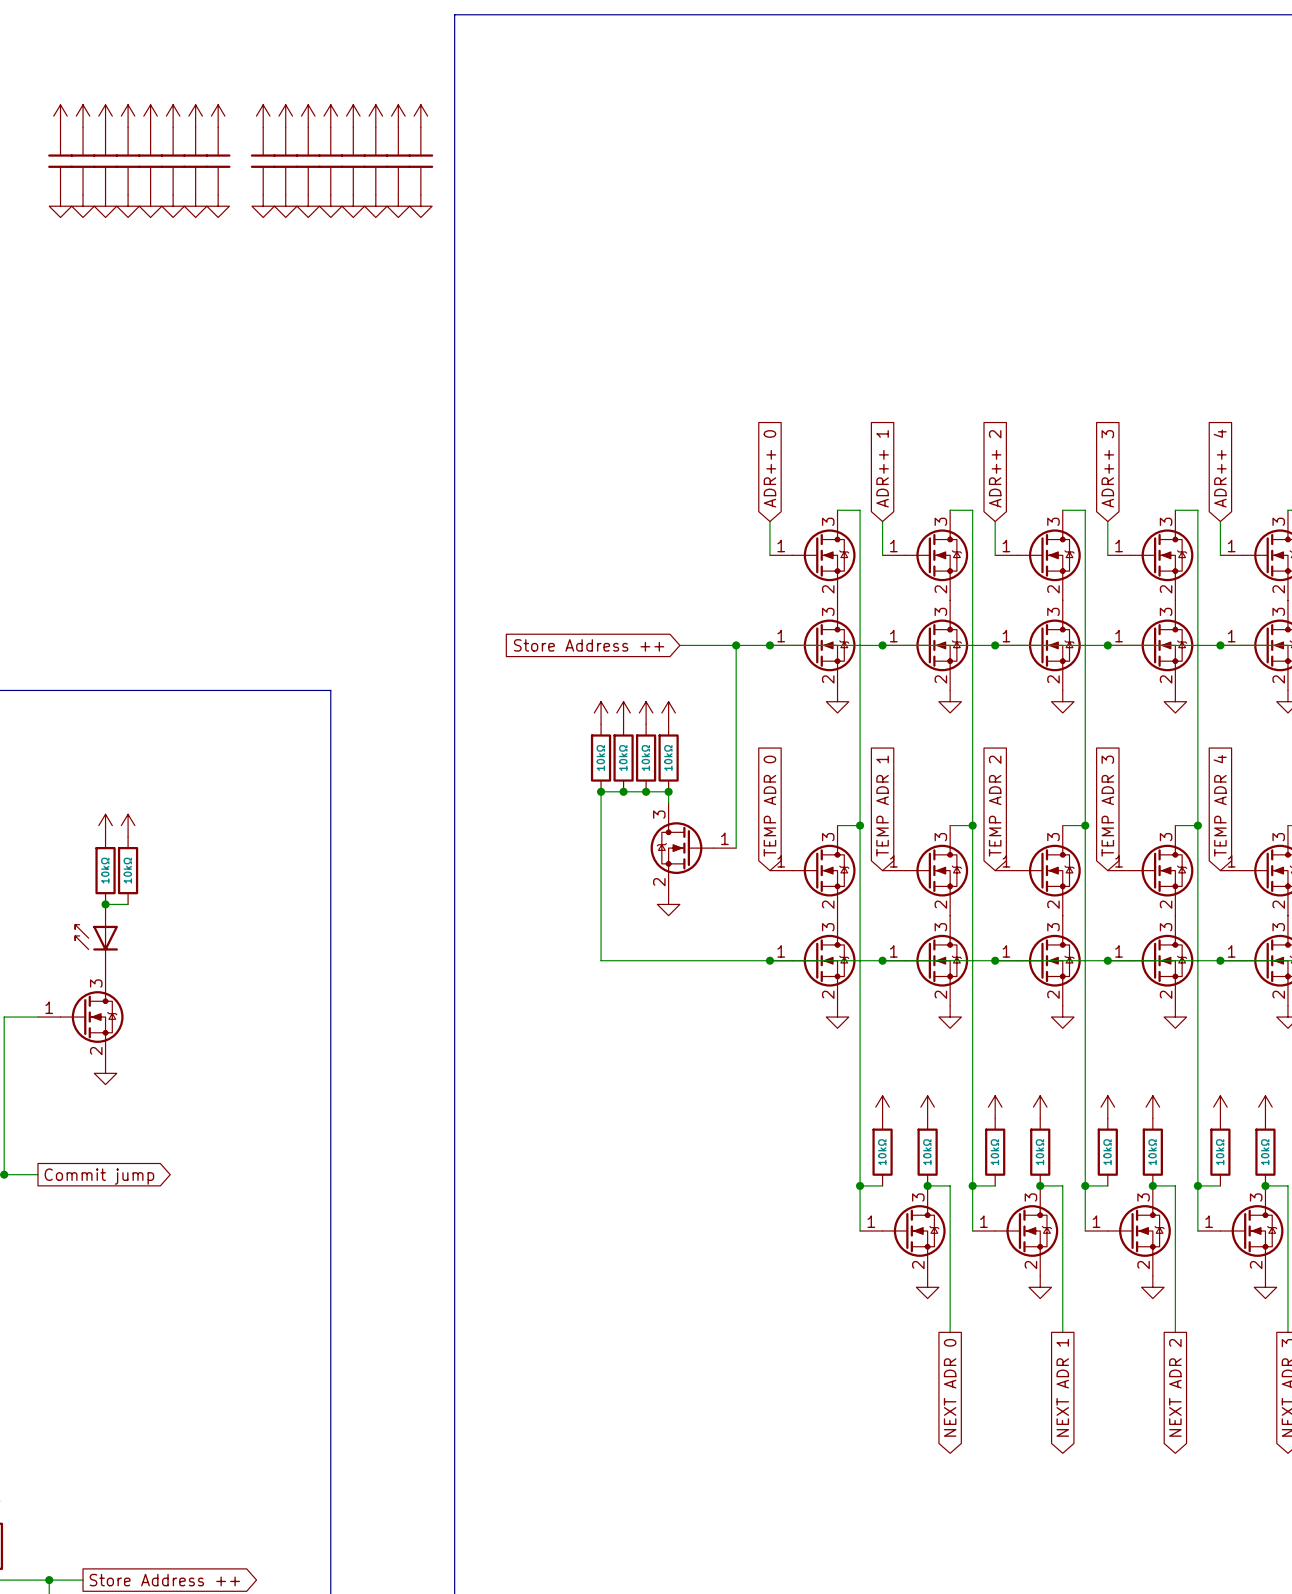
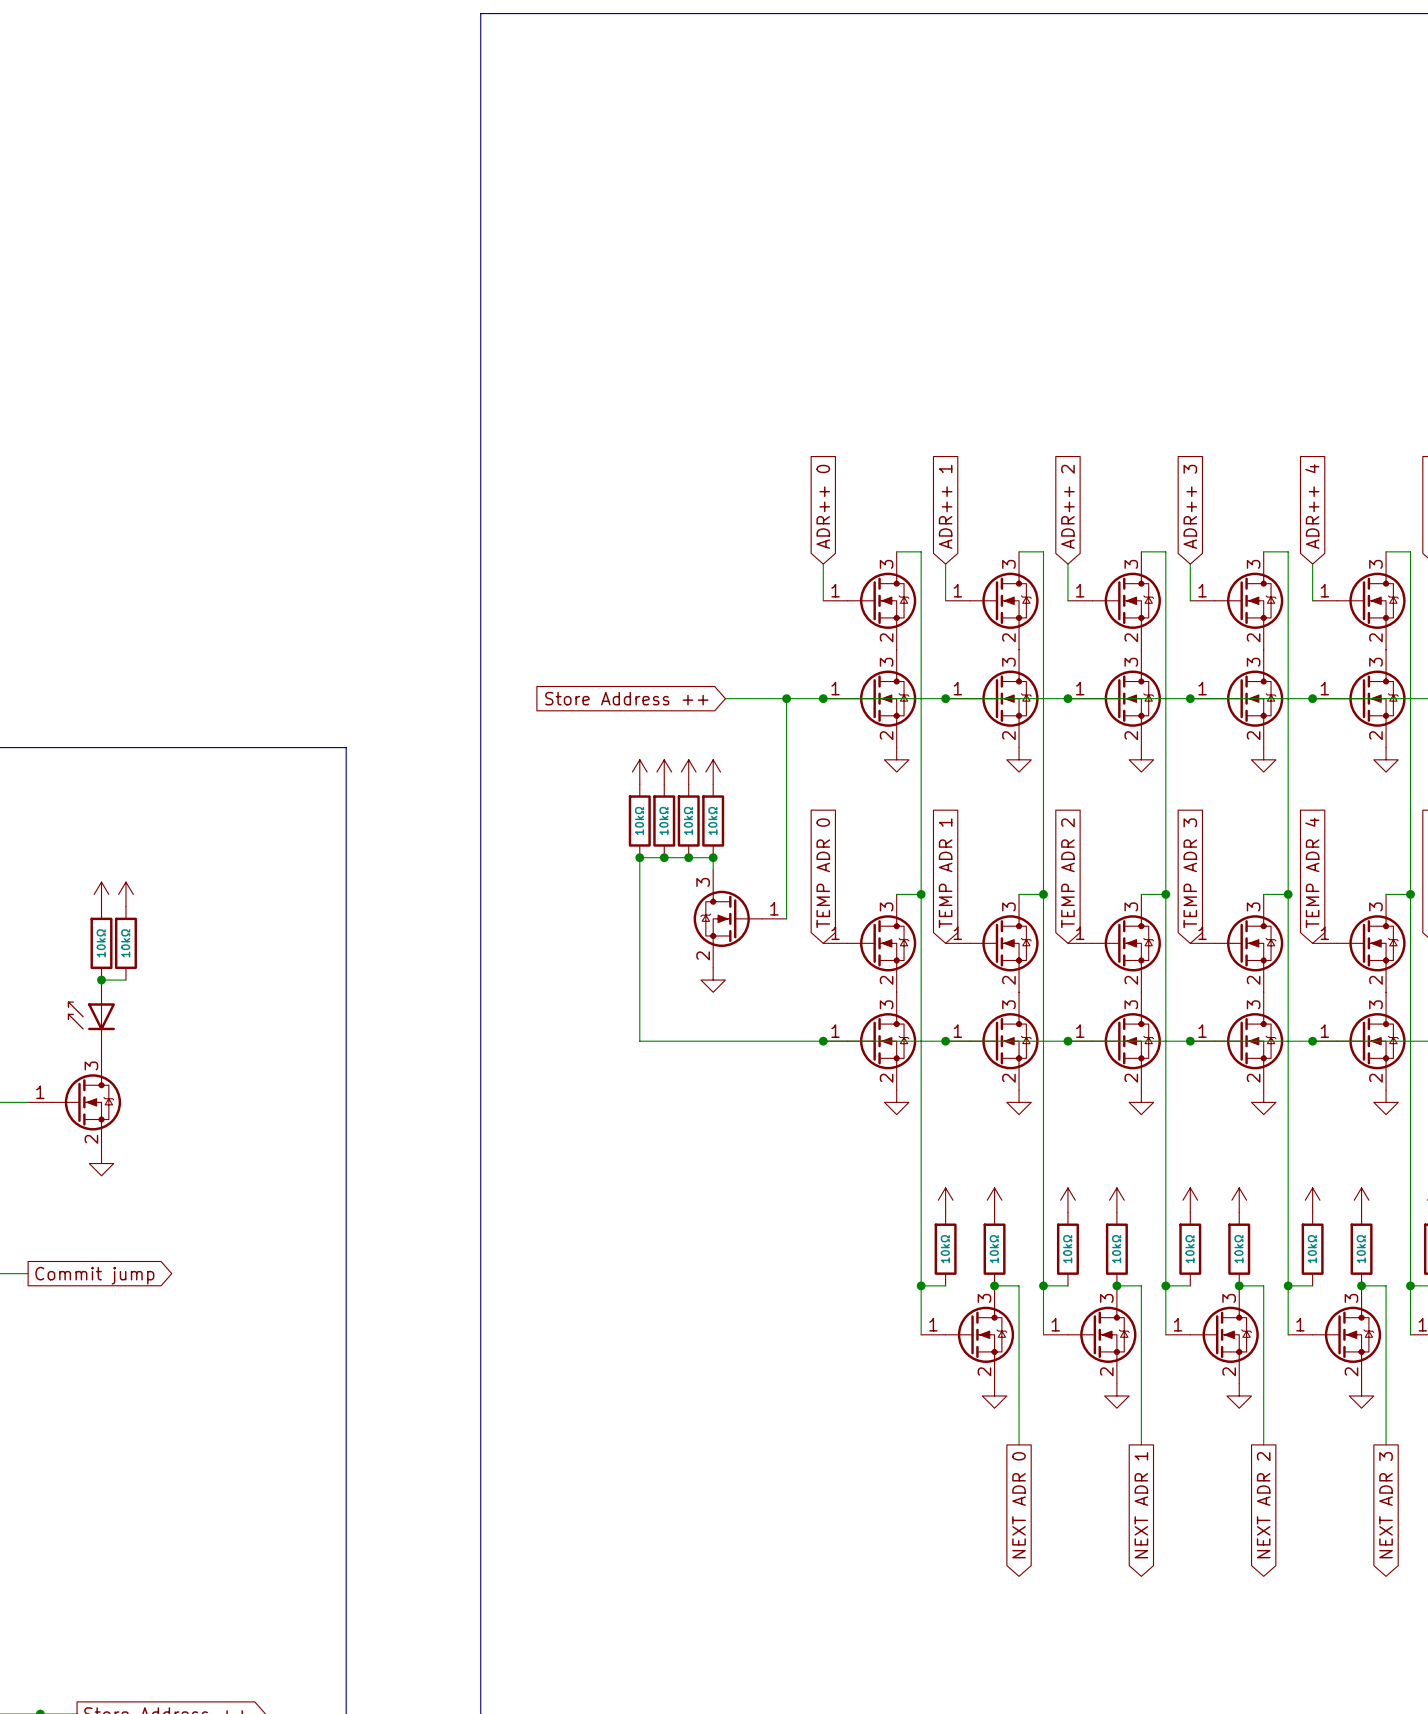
power symbol: (60, 116) -> none
power symbol: (83, 116) -> none
power symbol: (105, 116) -> none
power symbol: (128, 116) -> none
power symbol: (150, 116) -> none
power symbol: (173, 116) -> none
power symbol: (195, 116) -> none
power symbol: (218, 116) -> none
power symbol: (263, 116) -> none
power symbol: (285, 116) -> none
power symbol: (308, 116) -> none
power symbol: (330, 116) -> none
power symbol: (353, 116) -> none
power symbol: (375, 116) -> none
power symbol: (398, 116) -> none
power symbol: (420, 116) -> none
part: (60, 161) -> none
part: (83, 161) -> none
part: (105, 161) -> none
part: (128, 161) -> none
part: (150, 161) -> none
part: (173, 161) -> none
part: (195, 161) -> none
part: (218, 161) -> none
part: (263, 161) -> none
part: (285, 161) -> none
part: (308, 161) -> none
part: (330, 161) -> none
part: (353, 161) -> none
part: (375, 161) -> none
part: (398, 161) -> none
part: (420, 161) -> none
power symbol: (60, 206) -> none
power symbol: (83, 206) -> none
power symbol: (105, 206) -> none
power symbol: (128, 206) -> none
power symbol: (150, 206) -> none
power symbol: (173, 206) -> none
power symbol: (195, 206) -> none
power symbol: (218, 206) -> none
power symbol: (263, 206) -> none
power symbol: (285, 206) -> none
power symbol: (308, 206) -> none
power symbol: (330, 206) -> none
power symbol: (353, 206) -> none
power symbol: (375, 206) -> none
power symbol: (398, 206) -> none
power symbol: (420, 206) -> none

